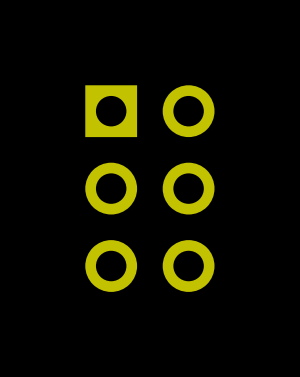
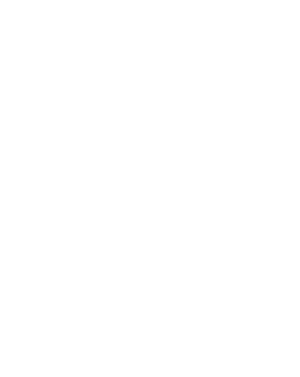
part: (149, 188) -> none

